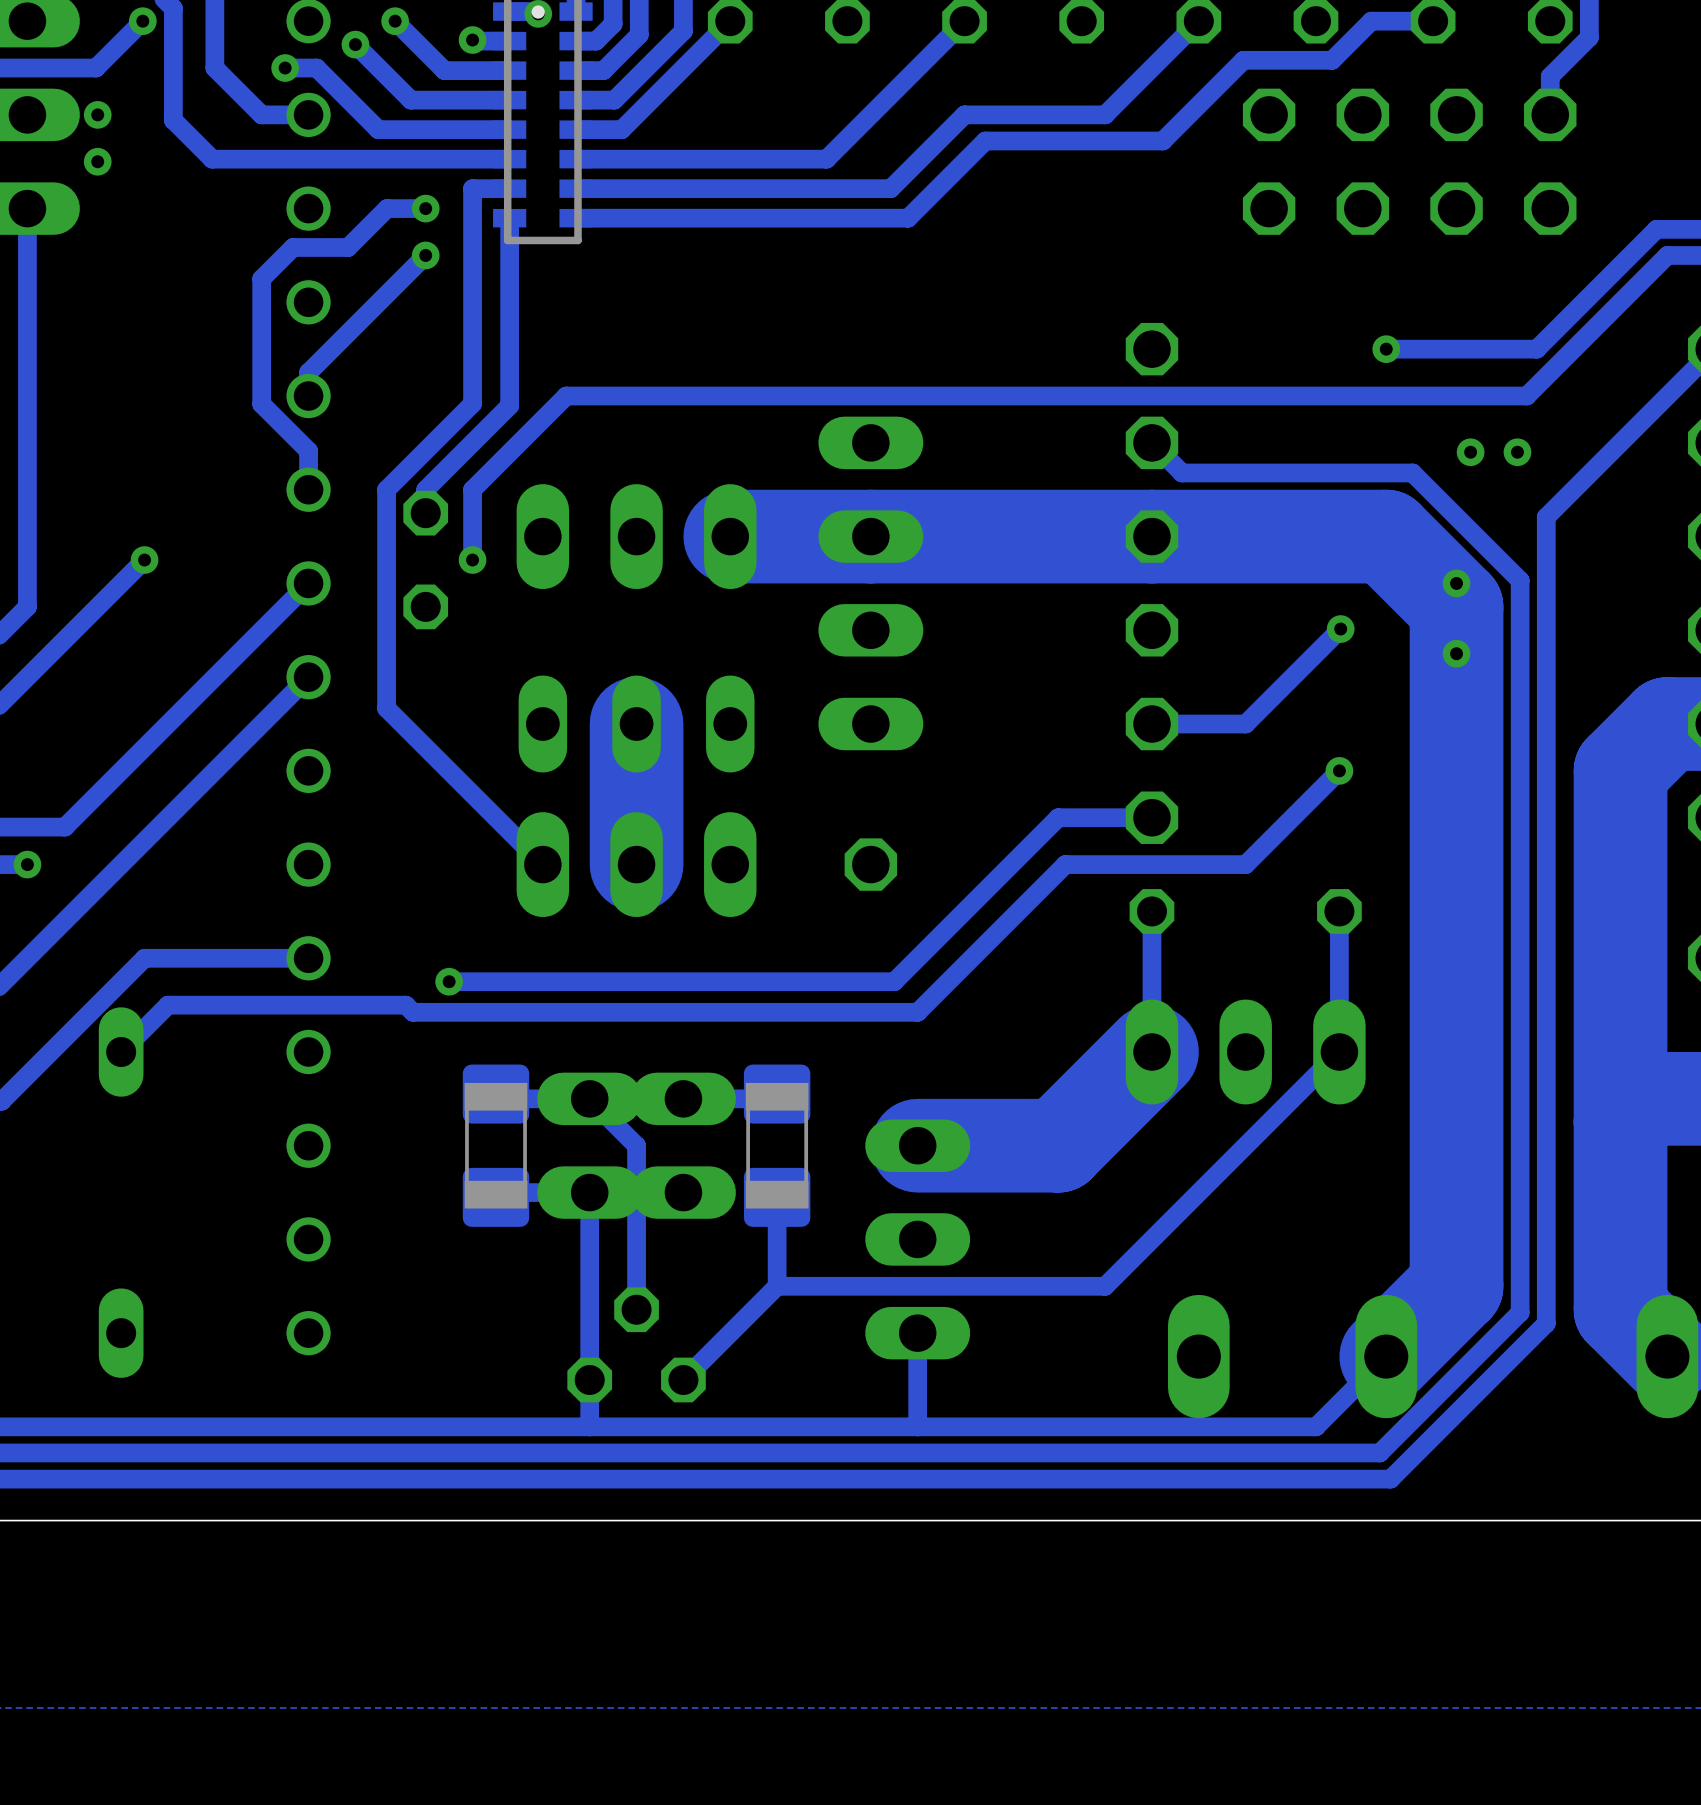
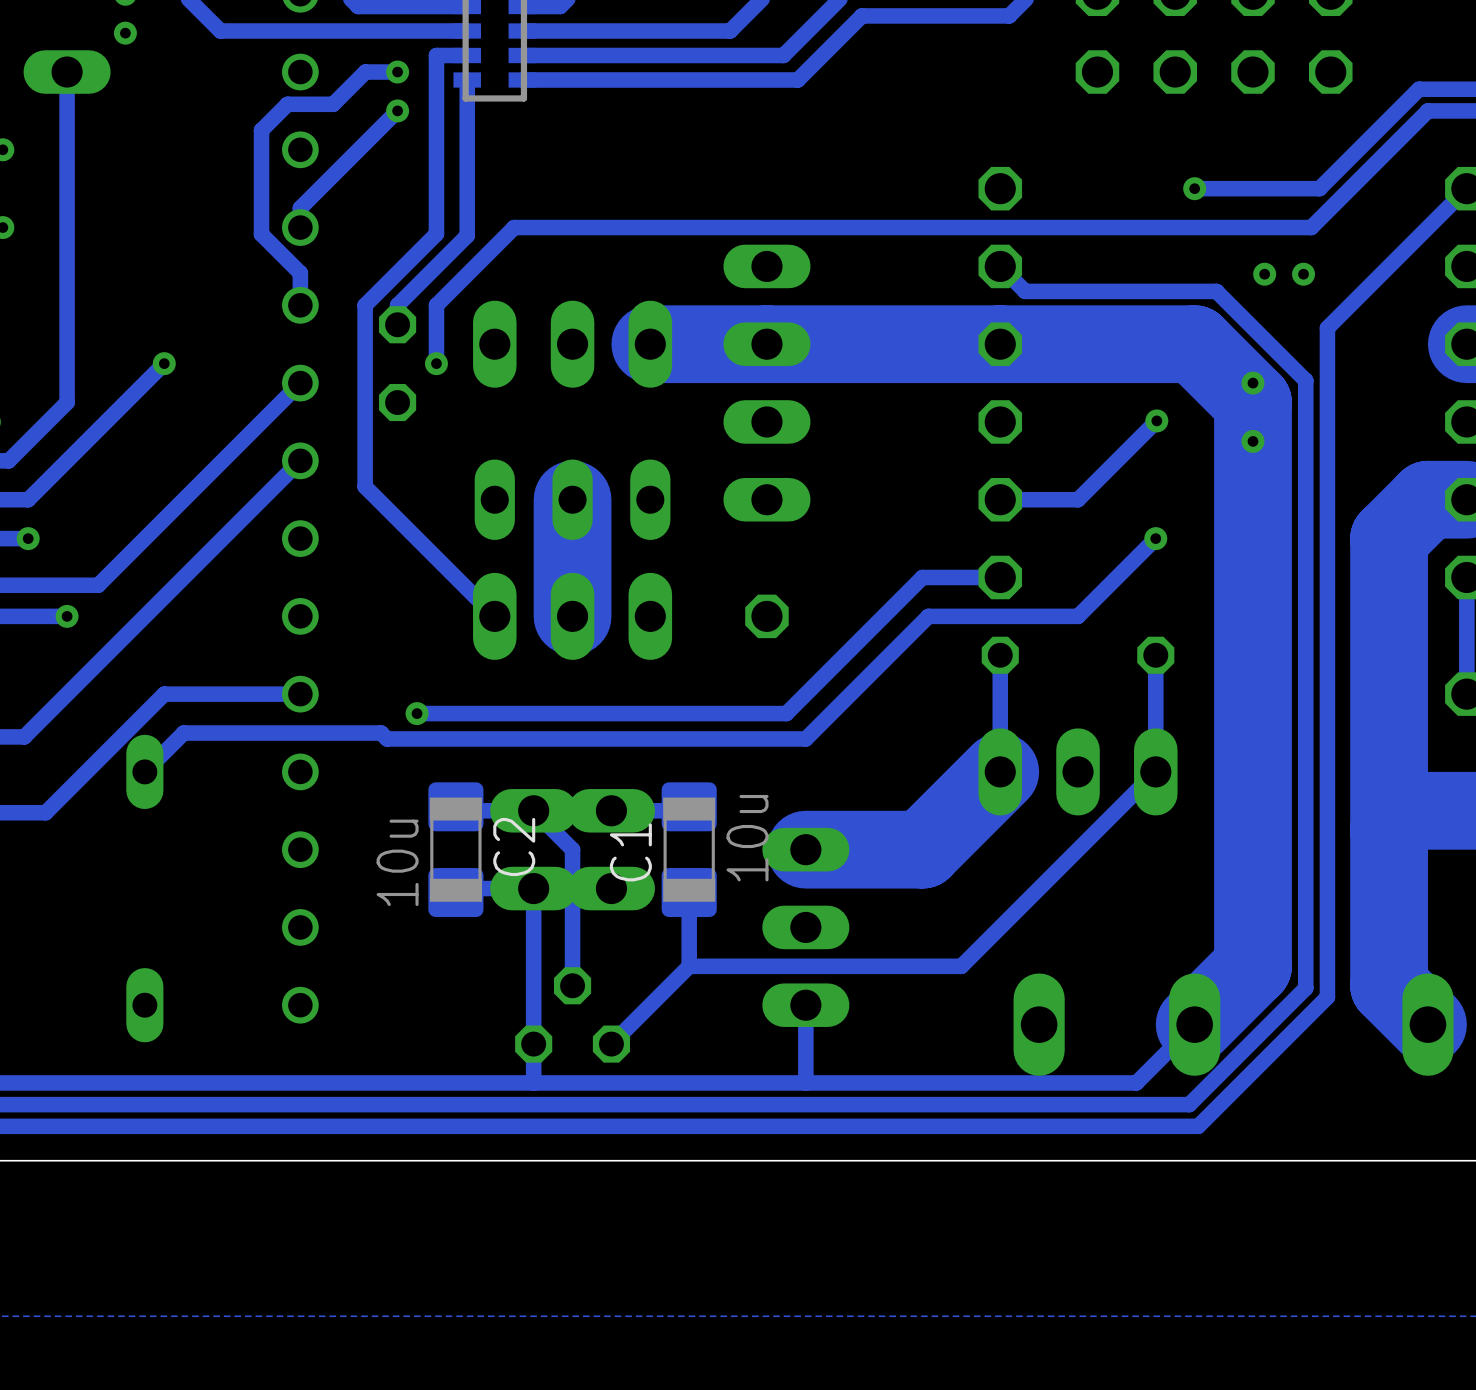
C1 value: none -> 10u (747, 838)
C2 name: none -> C2 (514, 846)
C1 name: none -> C1 (630, 852)
C2 value: none -> 10u (397, 862)

